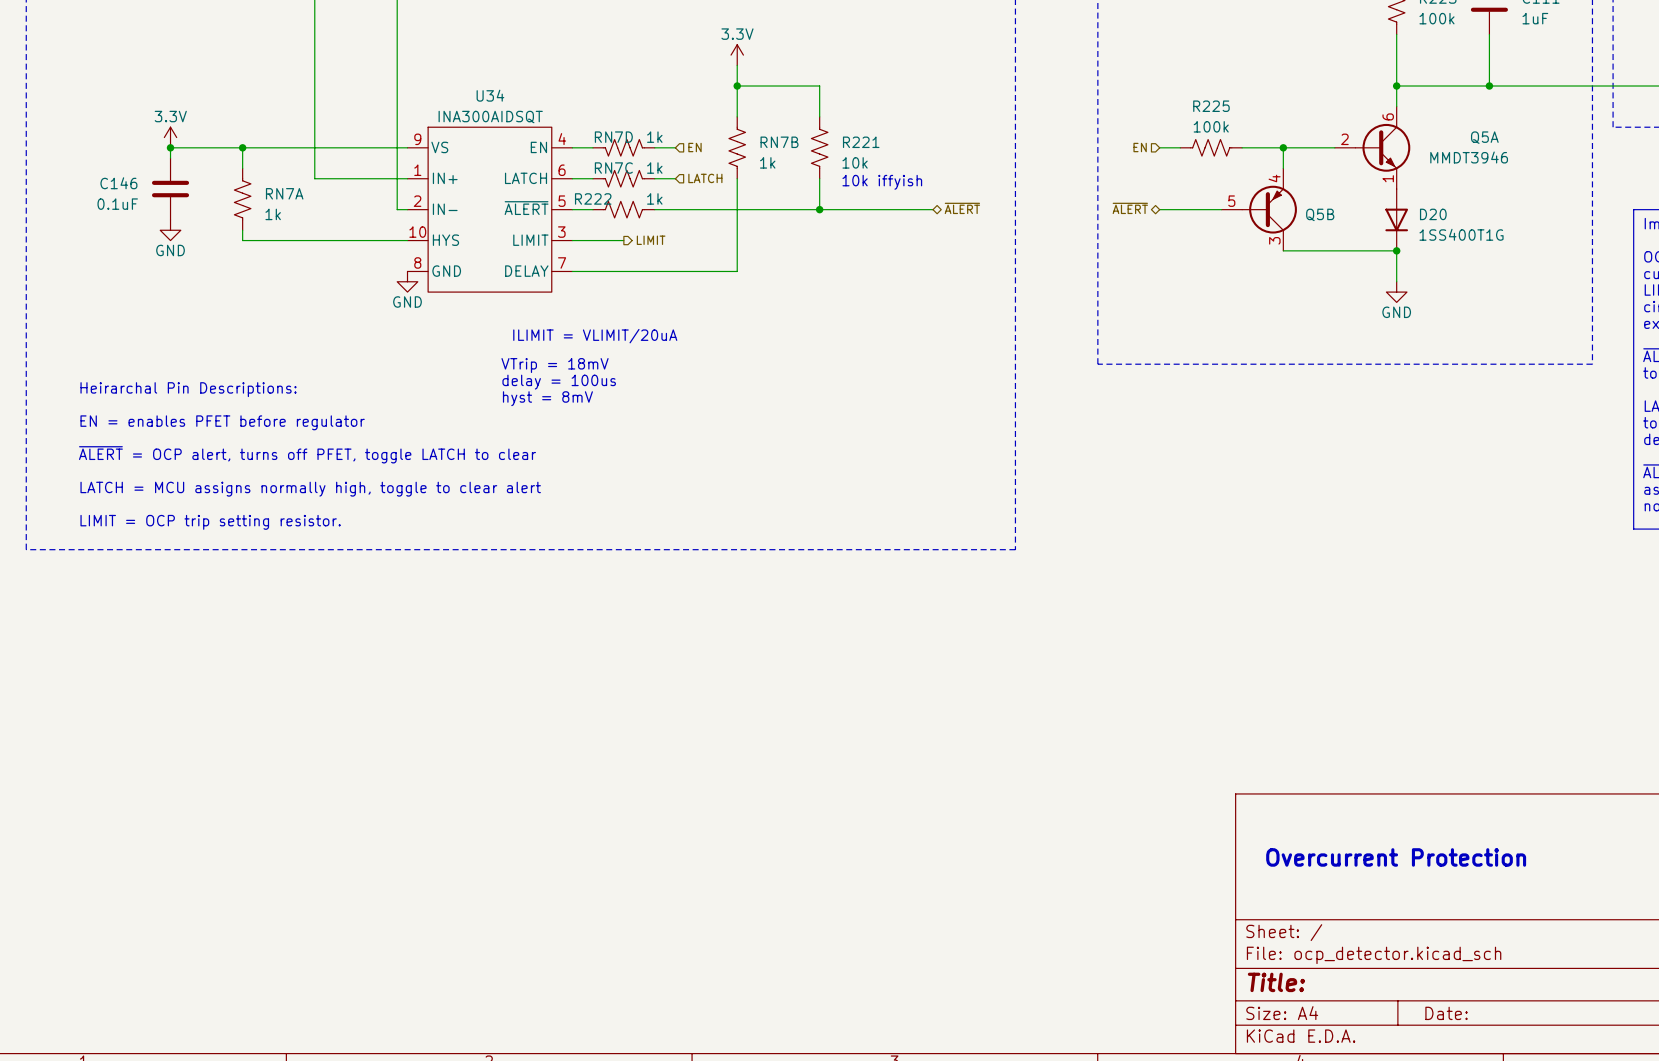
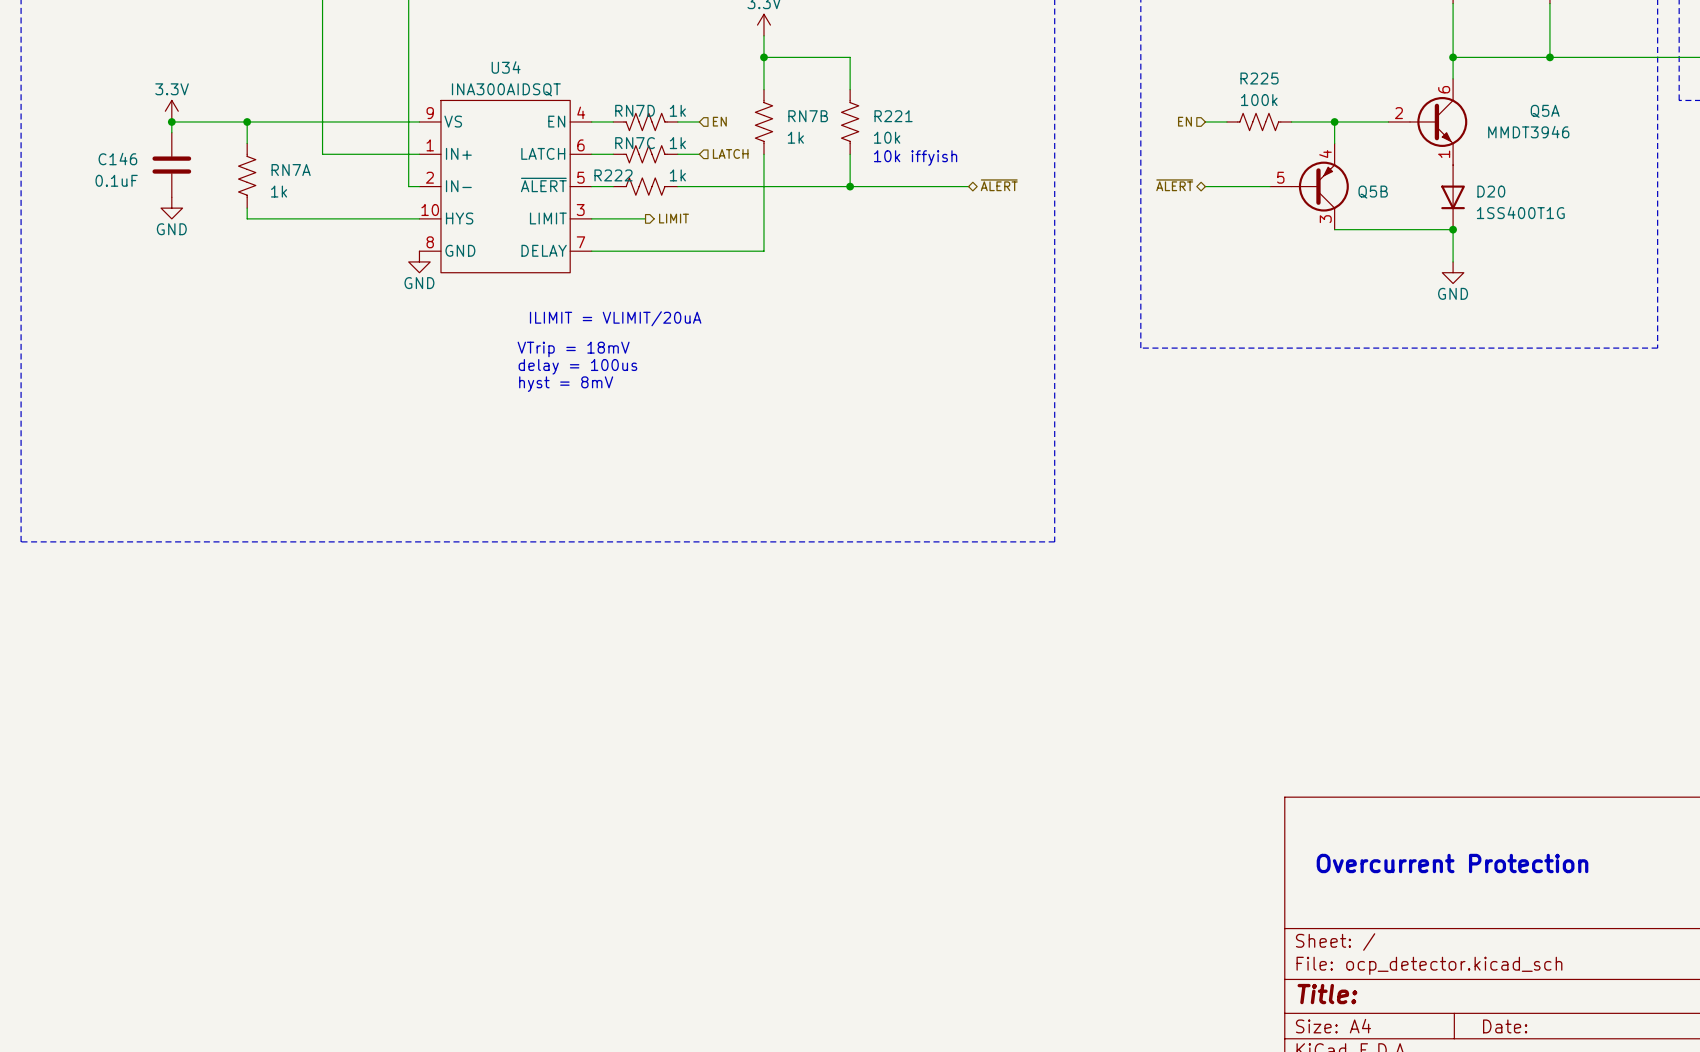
text: Heirarchal Pin Descriptions: (188, 389) -> none
text: EN = enables PFET before regulator (222, 422) -> none
text: ~{ALERT} = OCP alert, turns off PFET, toggle LATCH to clear (307, 454) -> none
text: LATCH = MCU assigns normally high, toggle to clear alert (310, 489) -> none
text: LIMIT = OCP trip setting resistor. (210, 522) -> none

